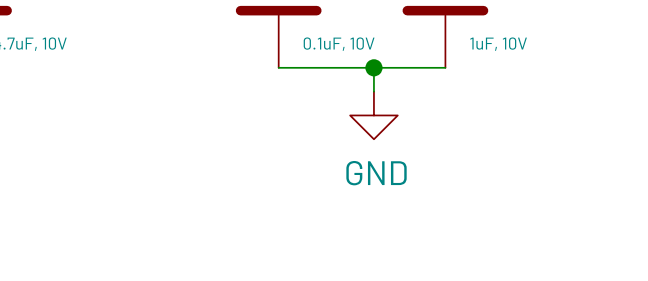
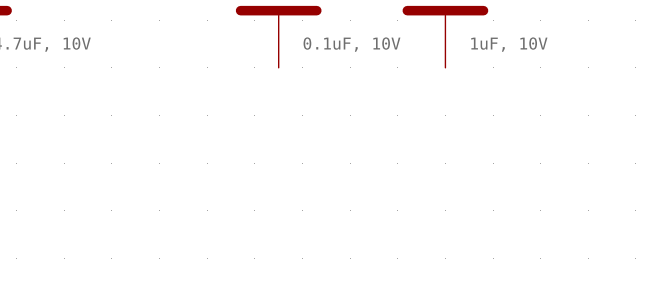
wire: (278, 67) (445, 67) -> none
wire: (373, 67) (373, 91) -> none
junction: (373, 67) -> none
power symbol: GND (373, 115) -> none

